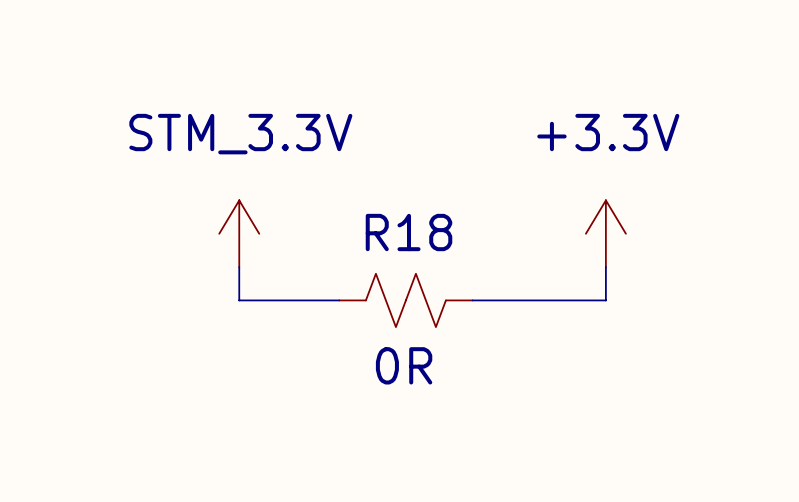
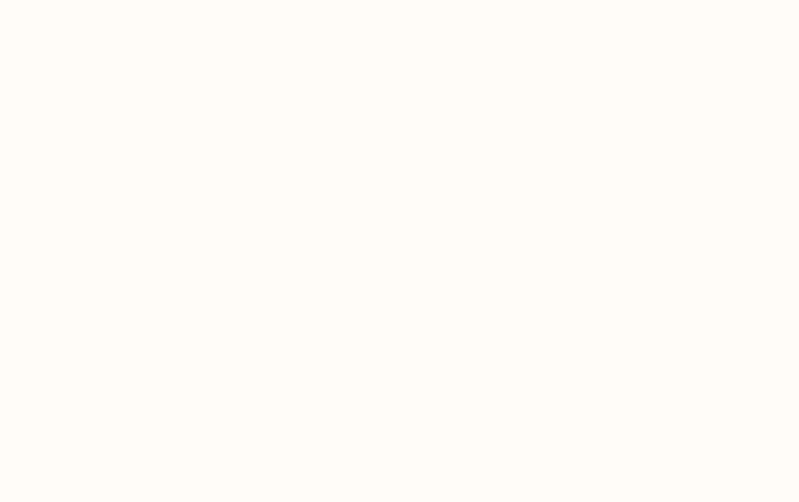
power symbol: STM_3.3V (239, 233) -> none
power symbol: +3.3V (605, 233) -> none
wire: (239, 267) (239, 300) (339, 300) -> none
wire: (605, 267) (605, 300) (472, 300) -> none
R18: 0R (405, 300) -> none

